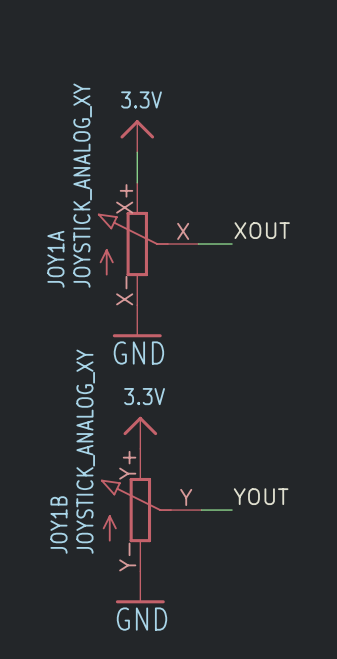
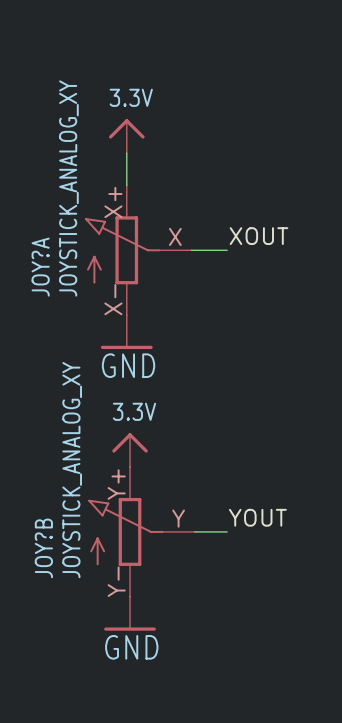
JOY1A name: JOY1A (55, 259) -> JOY?A (40, 267)
JOY1B name: JOY1B (58, 525) -> JOY?B (43, 548)

